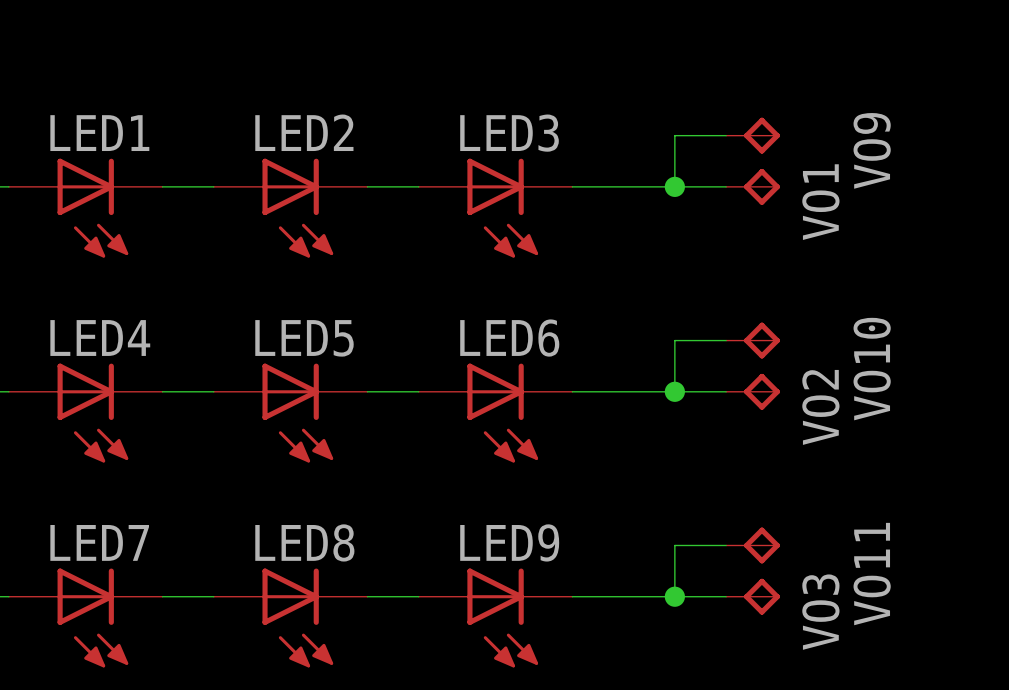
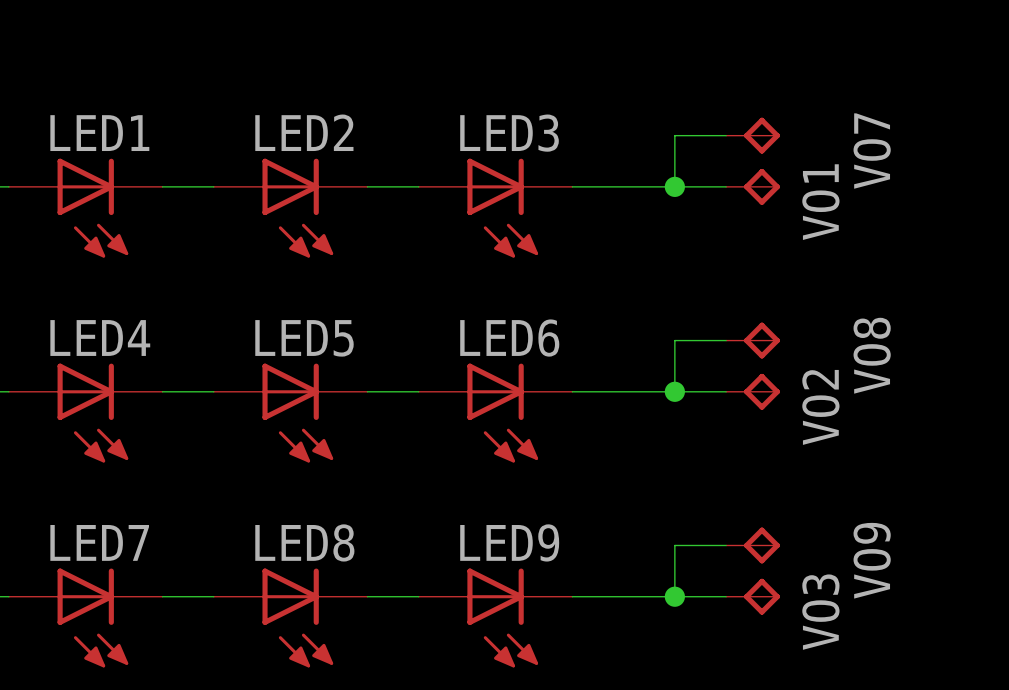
VO9 name: VO9 (872, 150) -> VO7 (872, 151)
VO10 name: VO10 (872, 369) -> VO8 (872, 355)
VO11 name: VO11 (872, 574) -> VO9 (872, 560)

